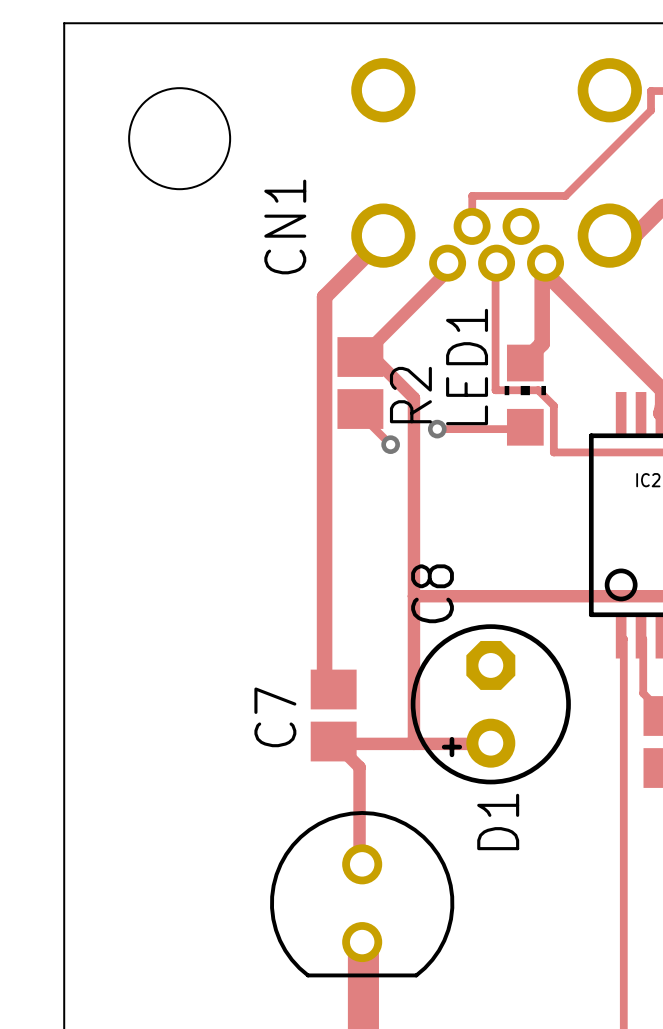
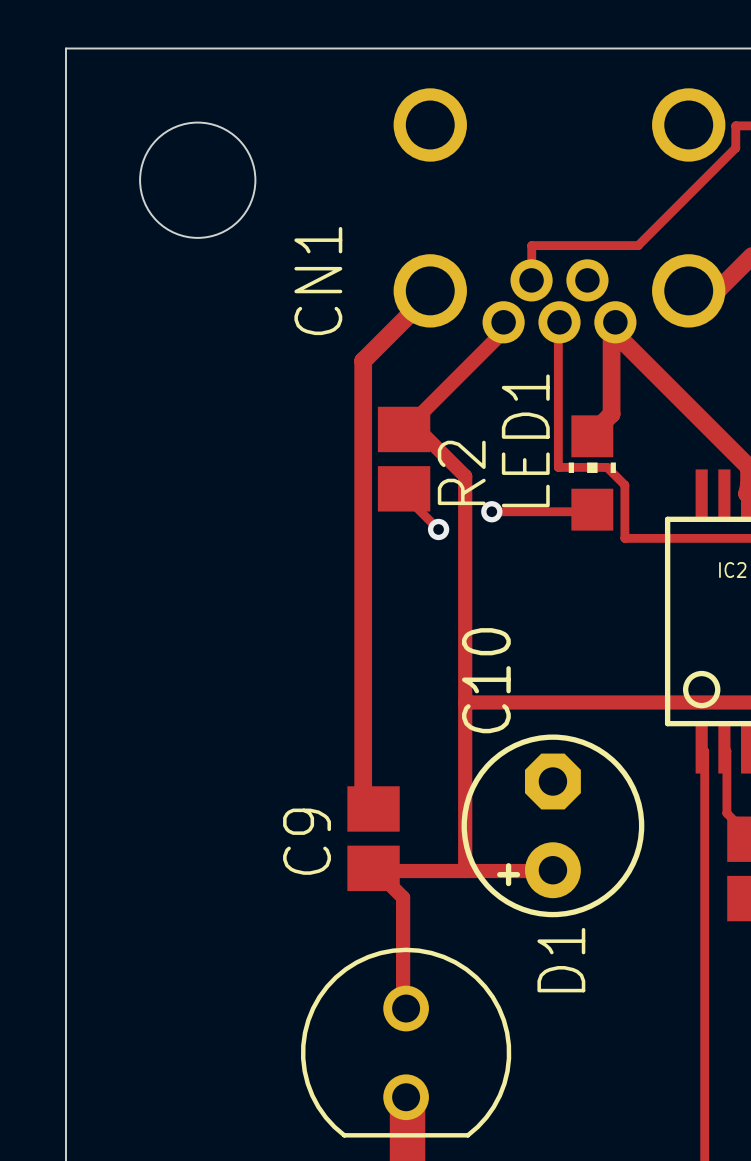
C8 name: C8 (432, 593) -> C10 (486, 680)
C7 name: C7 (275, 717) -> C9 (307, 841)

